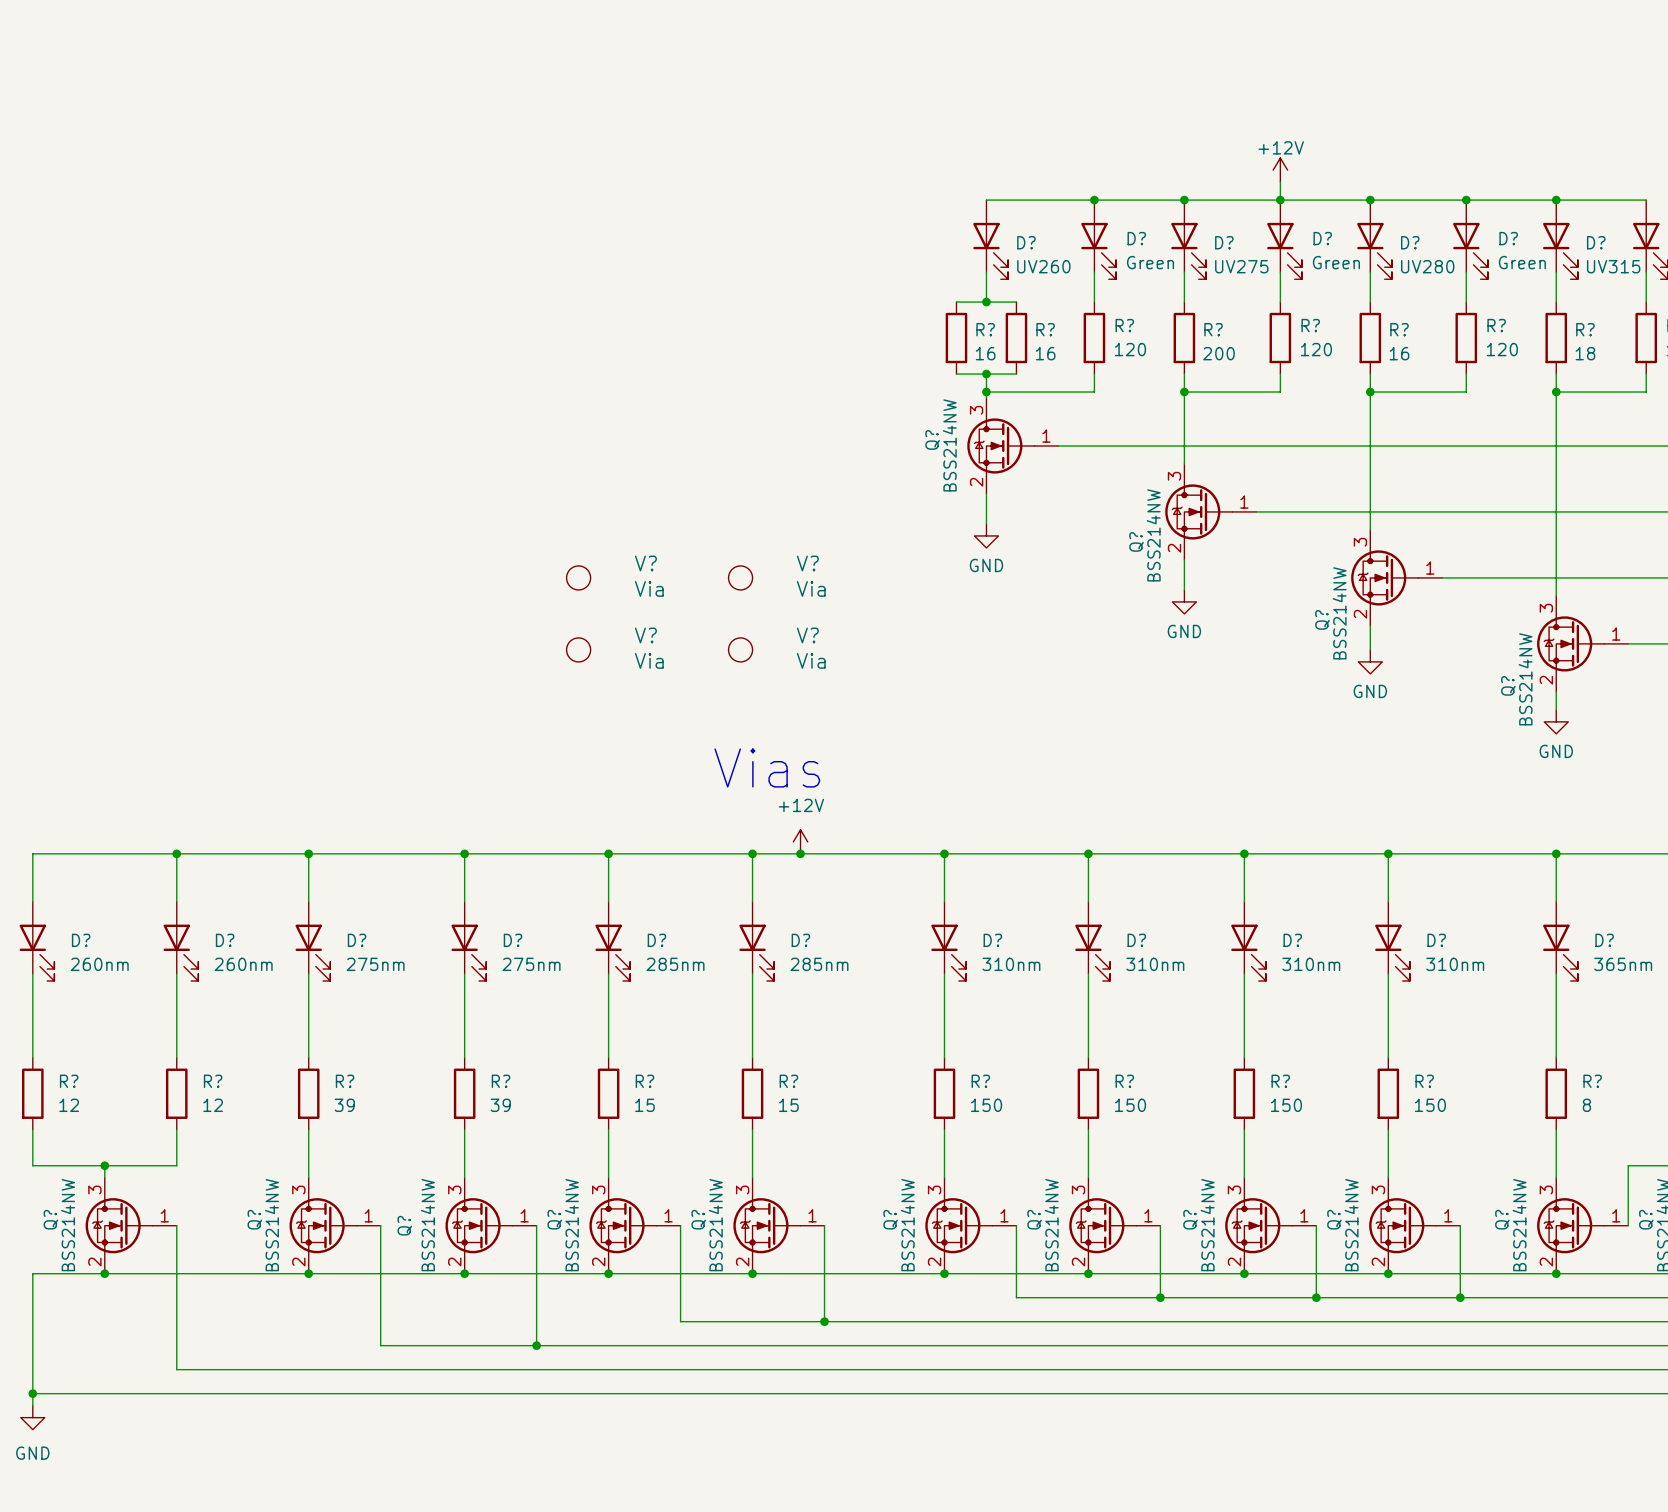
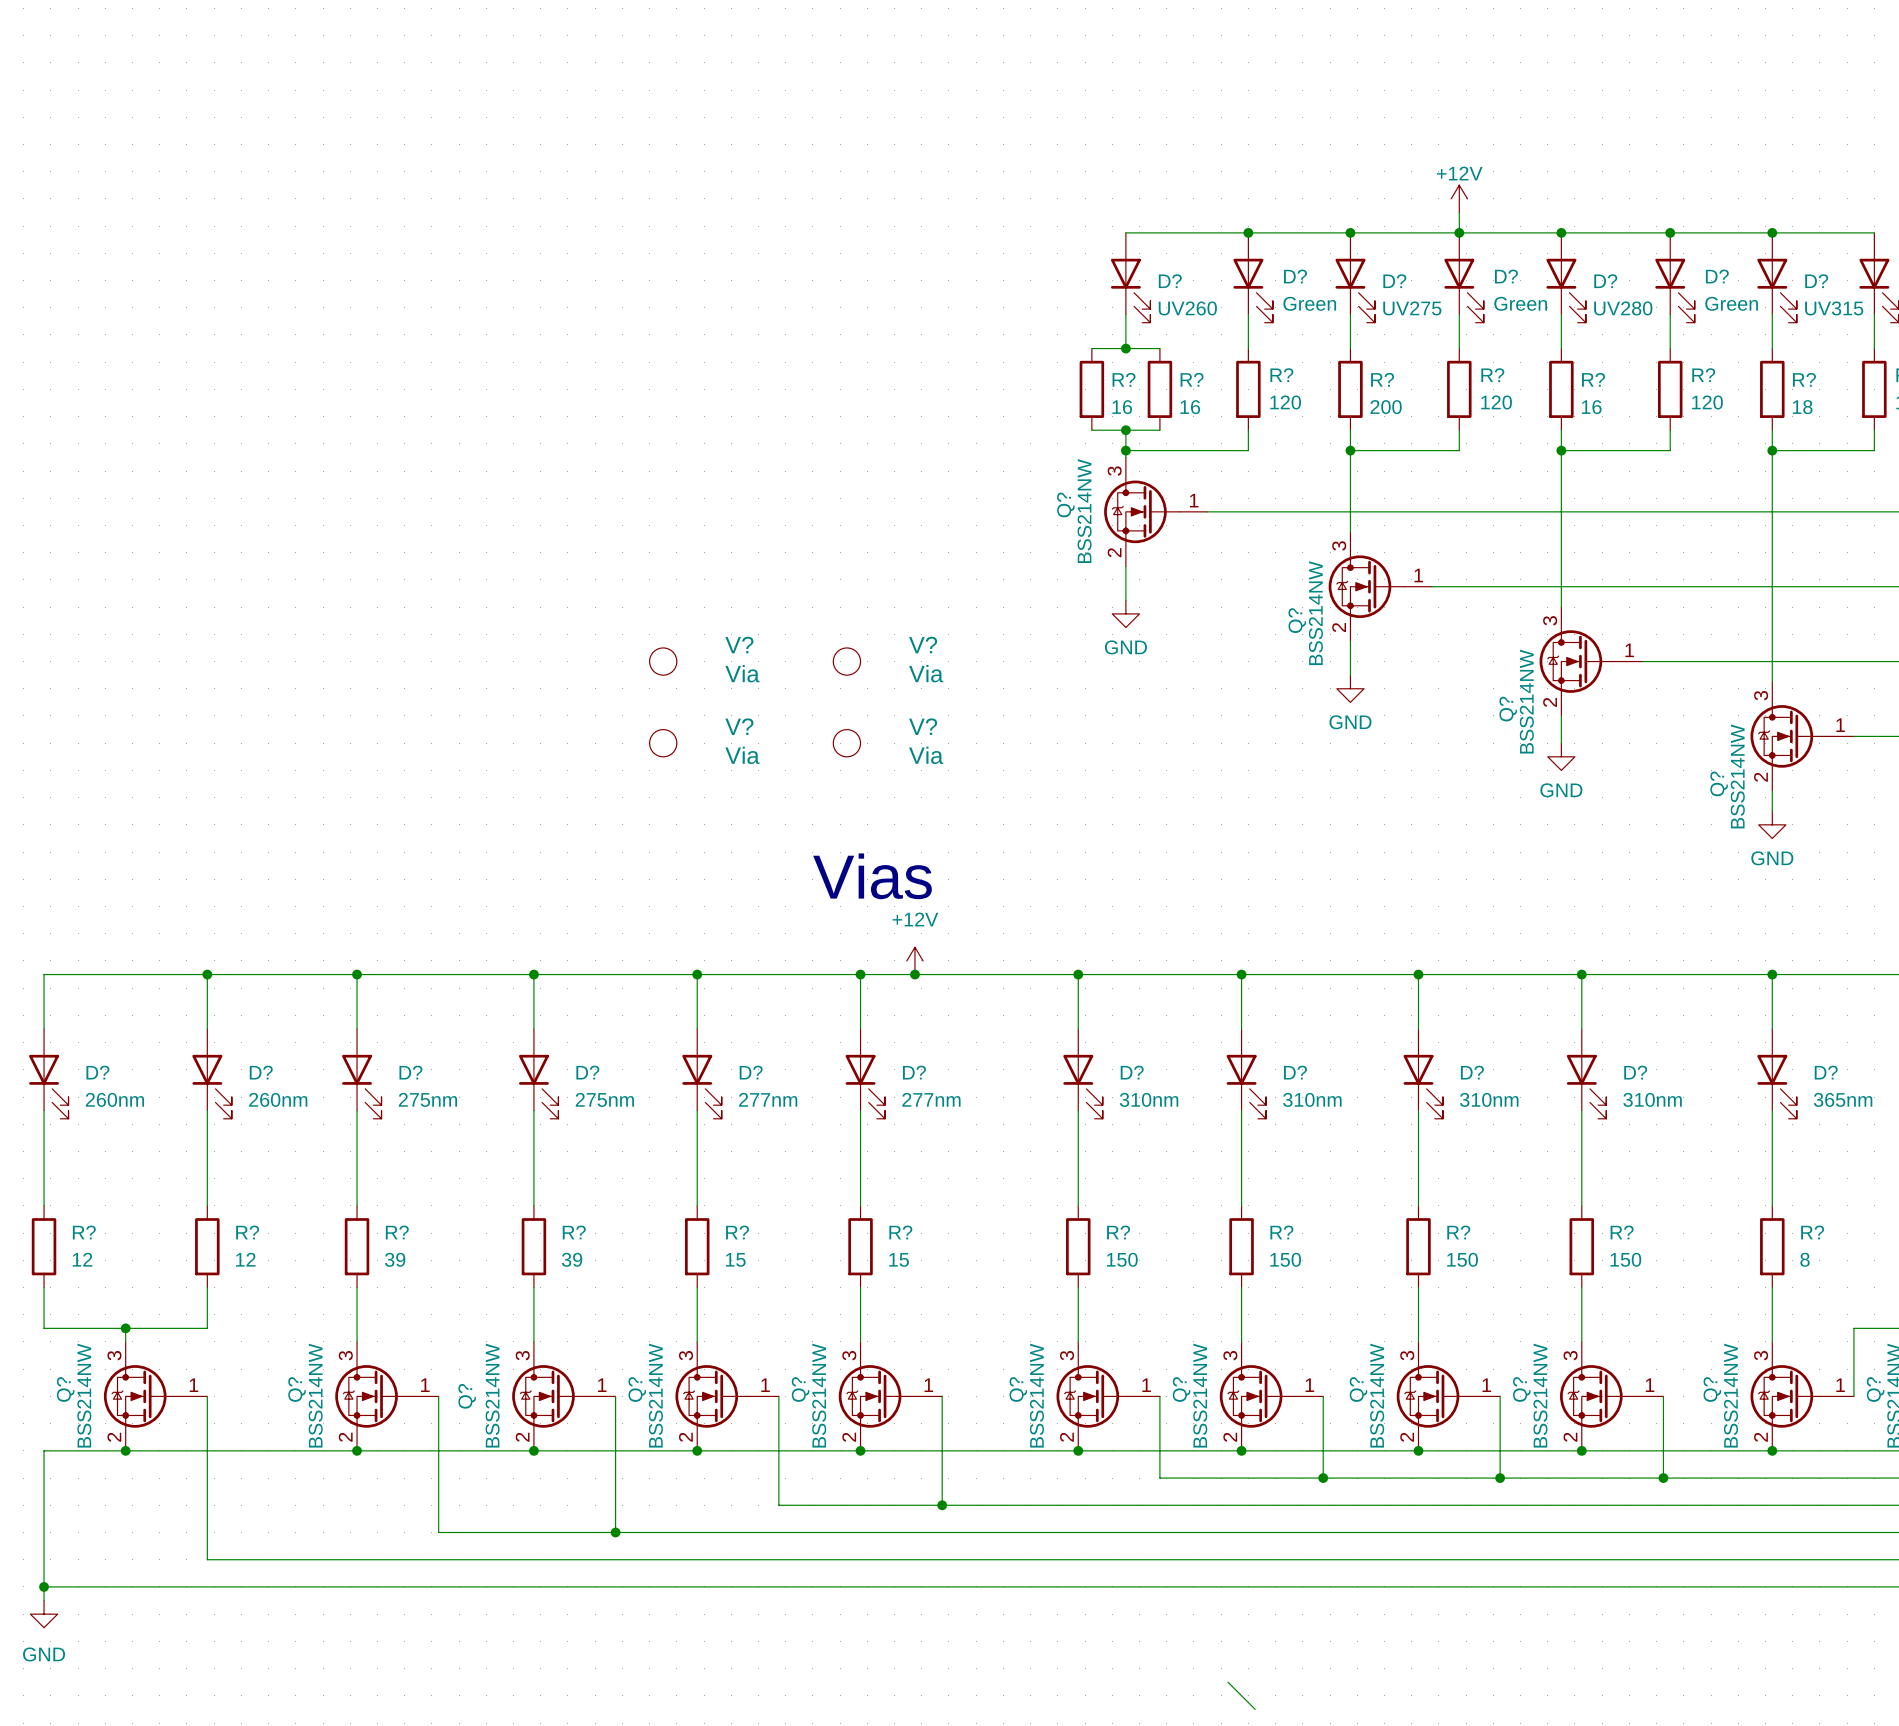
D? value: 285nm (675, 964) -> 277nm (768, 1099)
D? value: 285nm (819, 964) -> 277nm (931, 1099)
wire: none -> (1227, 1682) (1255, 1709)

